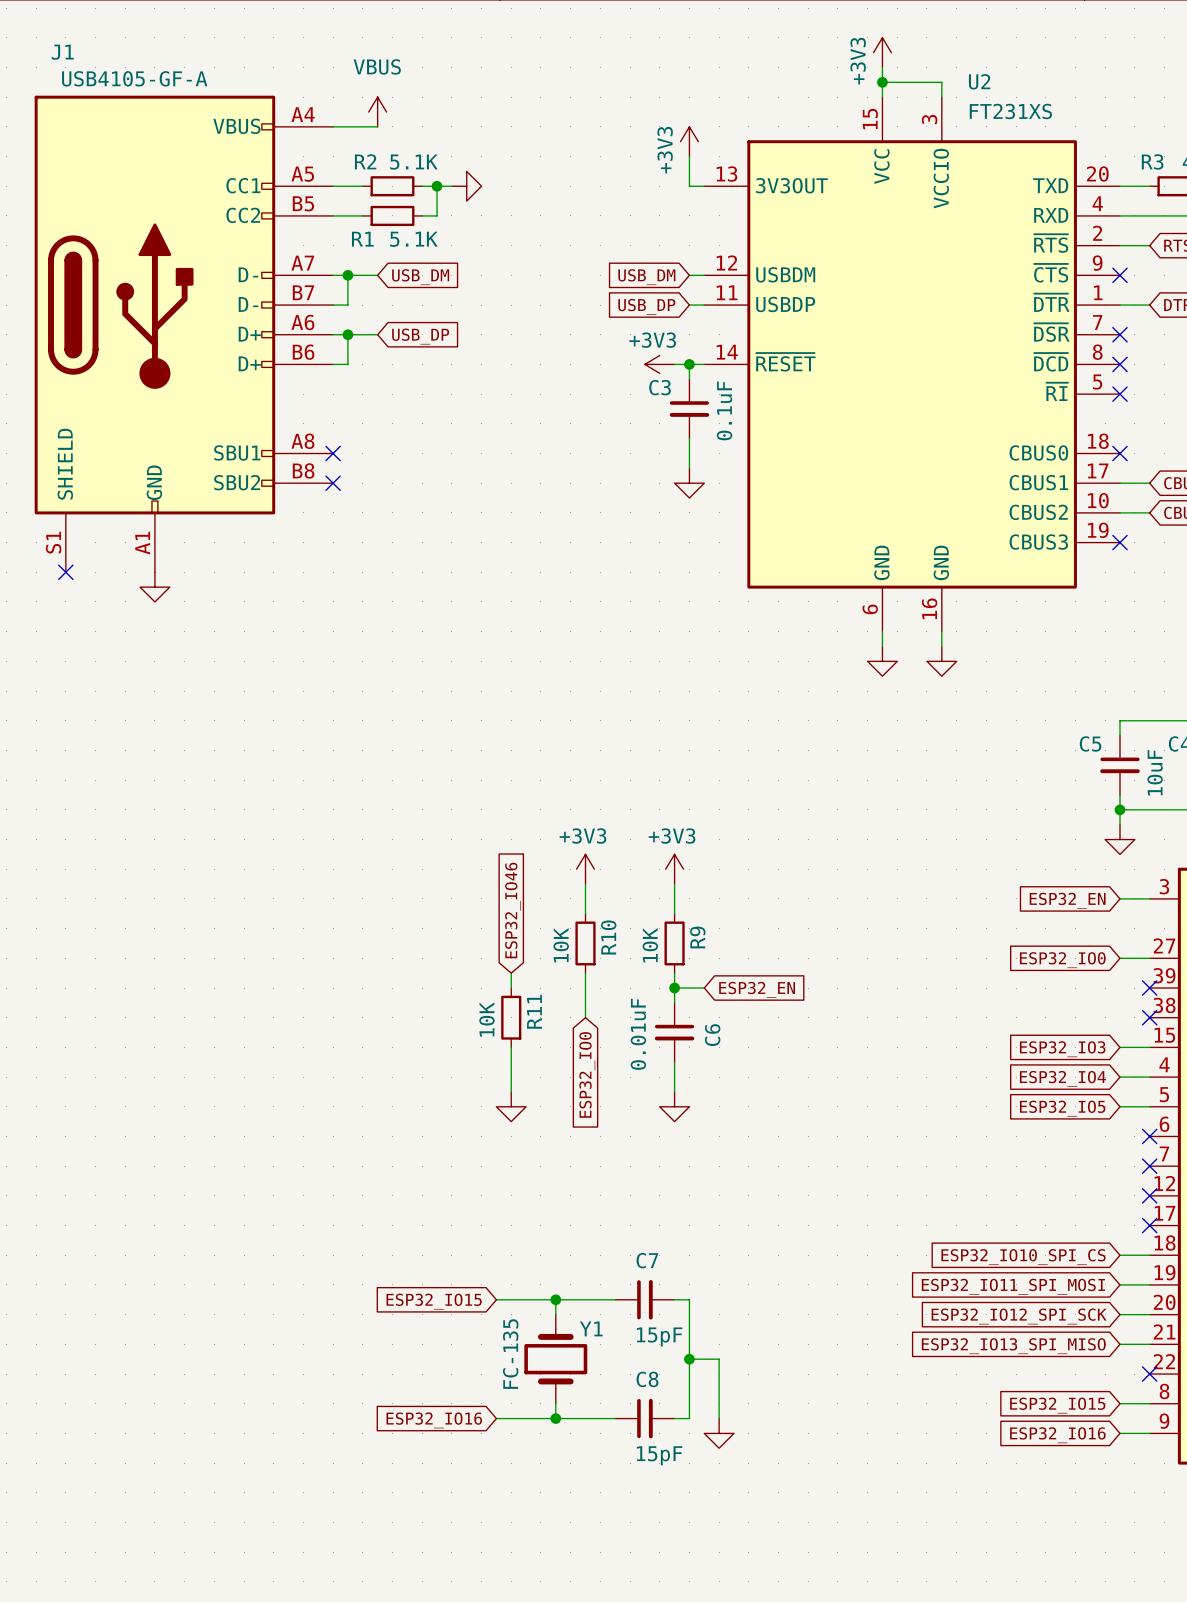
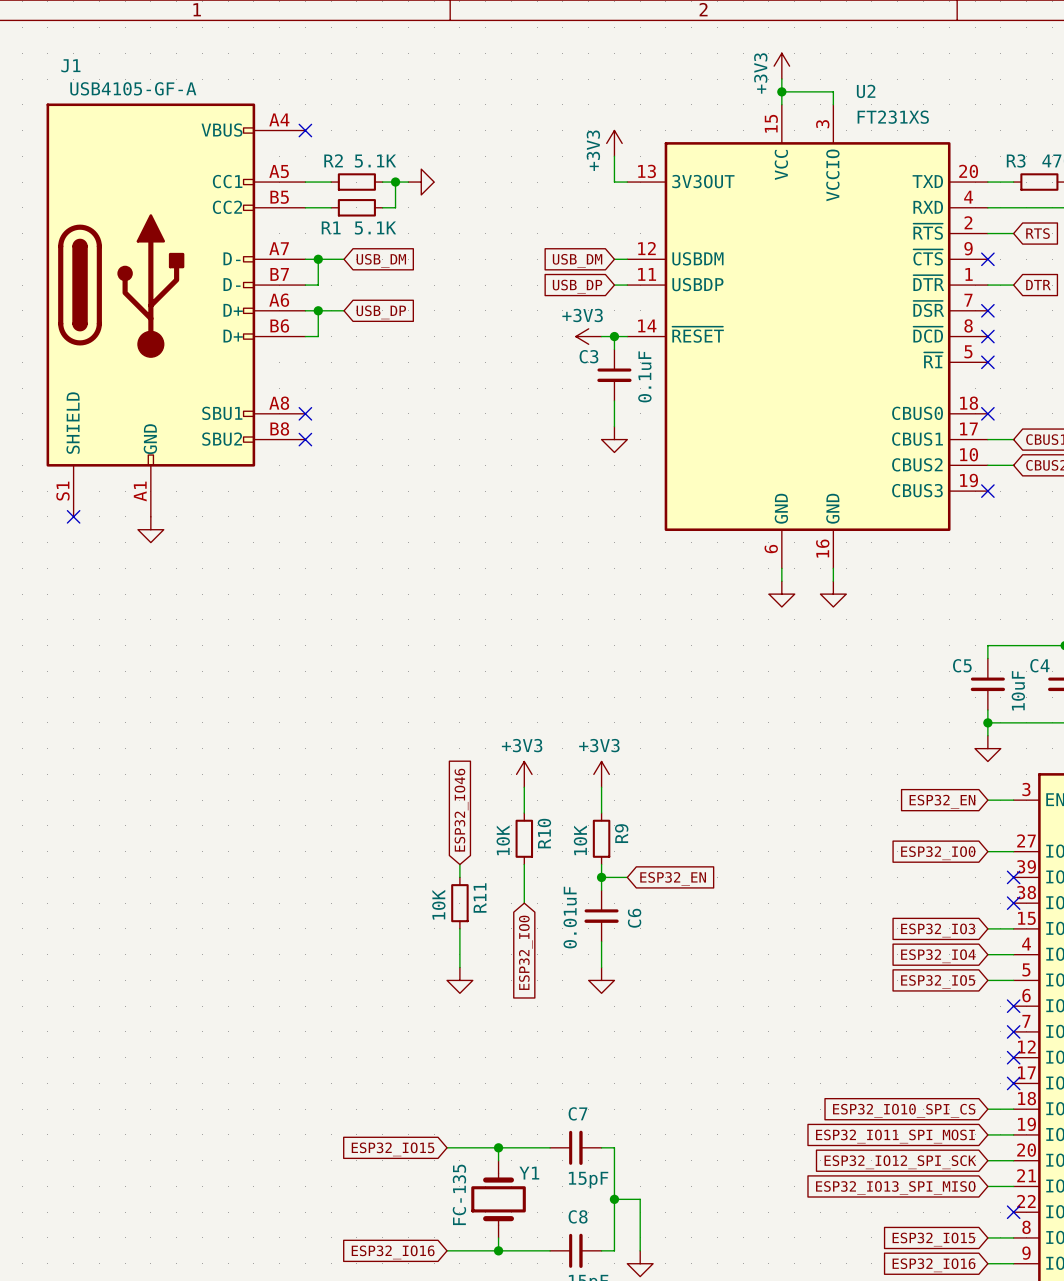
power symbol: VBUS (377, 112) -> none
wire: (333, 126) (377, 126) -> none
no-connect mark: none -> (305, 130)

